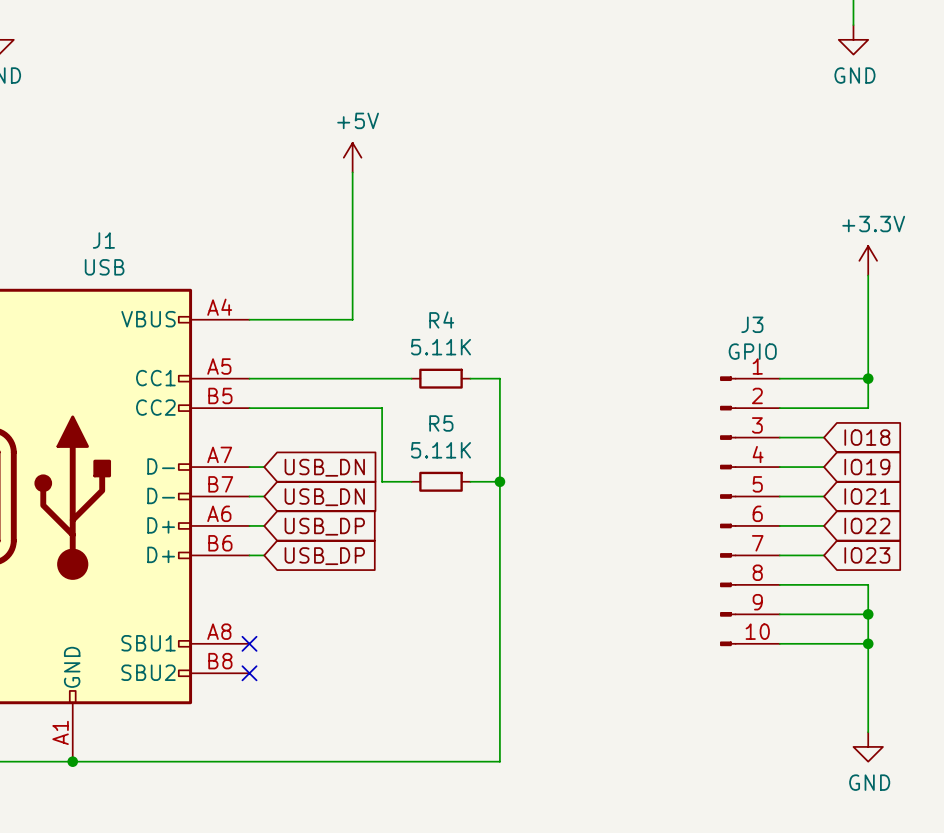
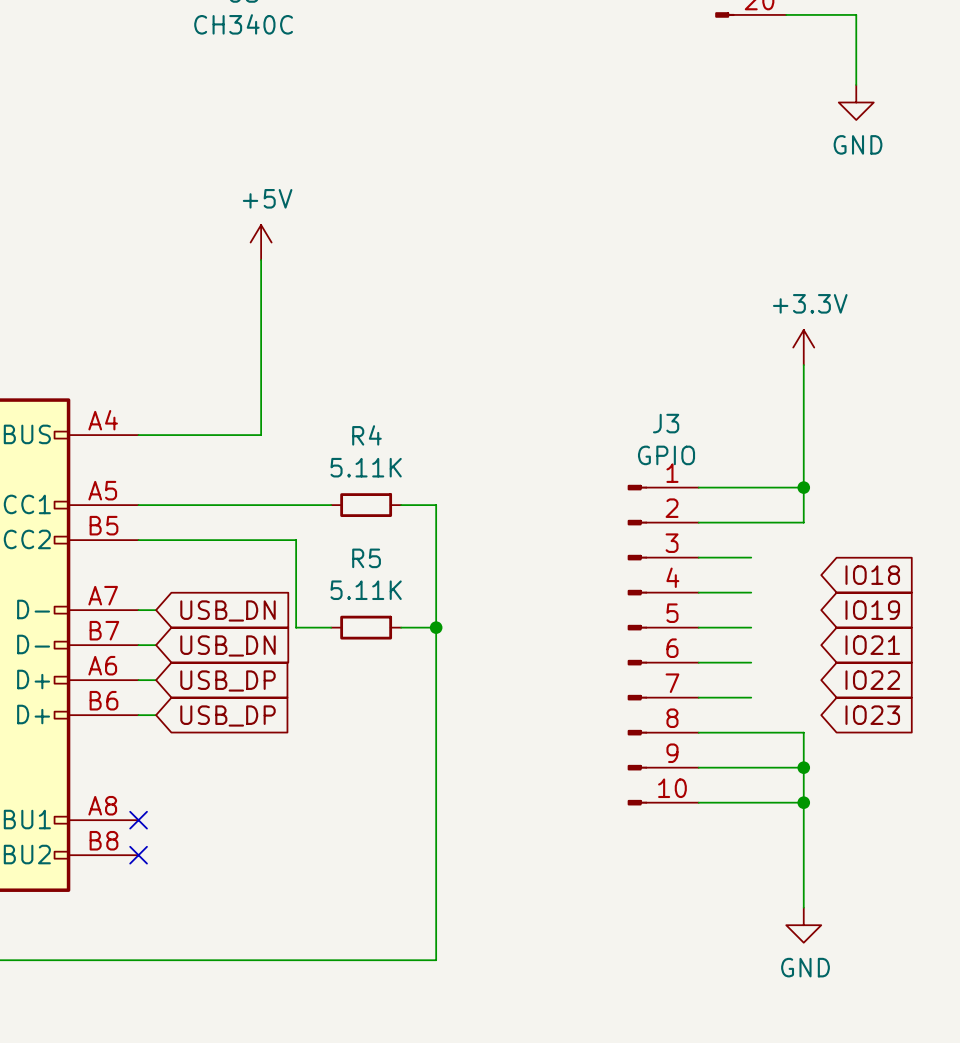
power symbol position: +3.3V (868, 260) -> +3.3V (803, 347)
wire: (868, 275) (868, 408) (779, 408) -> (803, 365) (803, 522) (698, 522)
wire: (779, 378) (868, 378) -> (698, 487) (803, 487)
junction position: (868, 378) -> (803, 487)
wire: (779, 437) (824, 437) -> (698, 557) (751, 557)
wire: (779, 467) (824, 467) -> (698, 592) (751, 592)
wire: (779, 496) (824, 496) -> (698, 627) (751, 627)
J3 position: (749, 511) -> (663, 645)
wire: (779, 525) (824, 525) -> (698, 662) (751, 662)
wire: (779, 555) (824, 555) -> (698, 697) (751, 697)
wire: (779, 584) (868, 584) (868, 732) -> (698, 732) (803, 732) (803, 907)
junction: none -> (803, 767)
wire: (779, 614) (868, 614) -> (698, 767) (803, 767)
junction: (868, 614) -> none
junction: none -> (803, 802)
wire: (779, 643) (868, 643) -> (698, 802) (803, 802)
junction: (868, 643) -> none
power symbol position: GND (868, 746) -> GND (803, 925)

